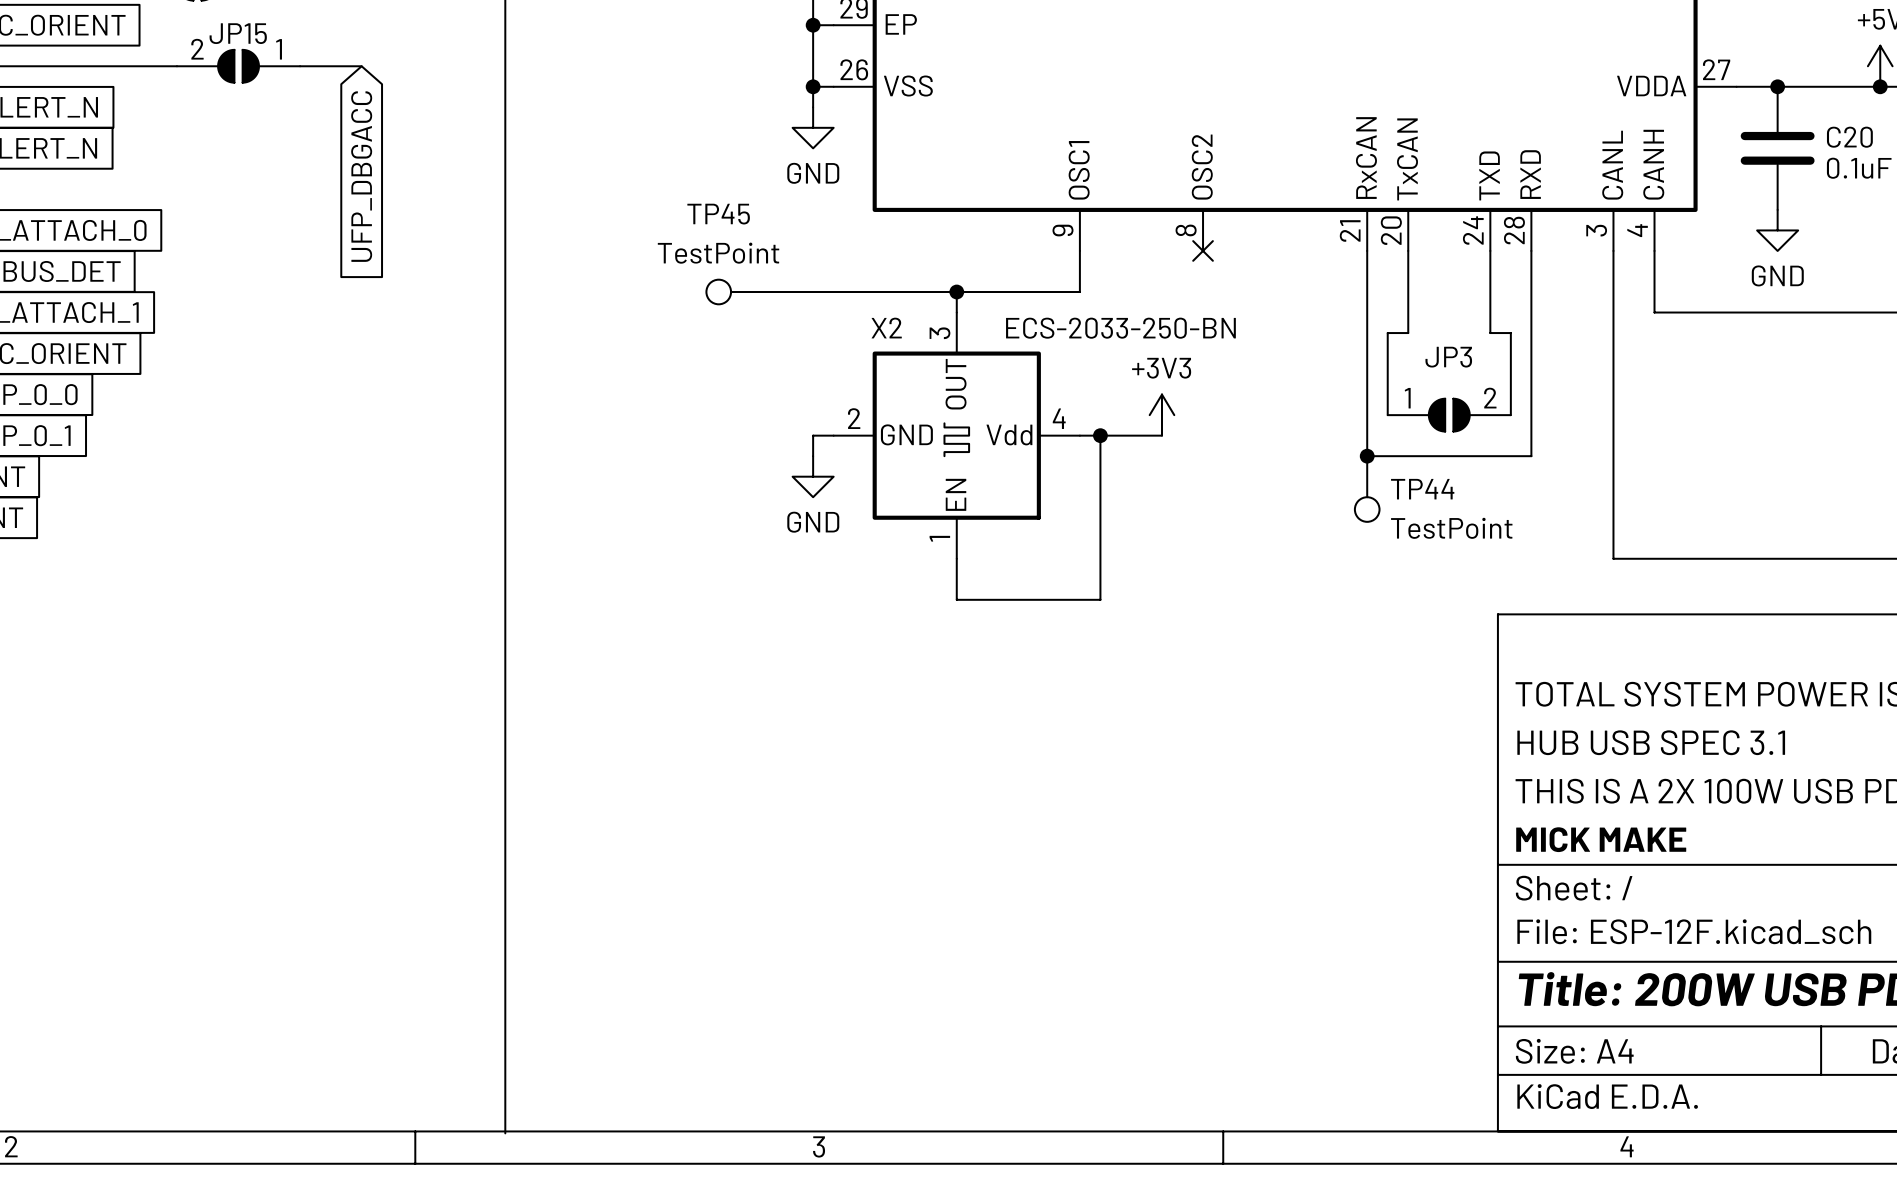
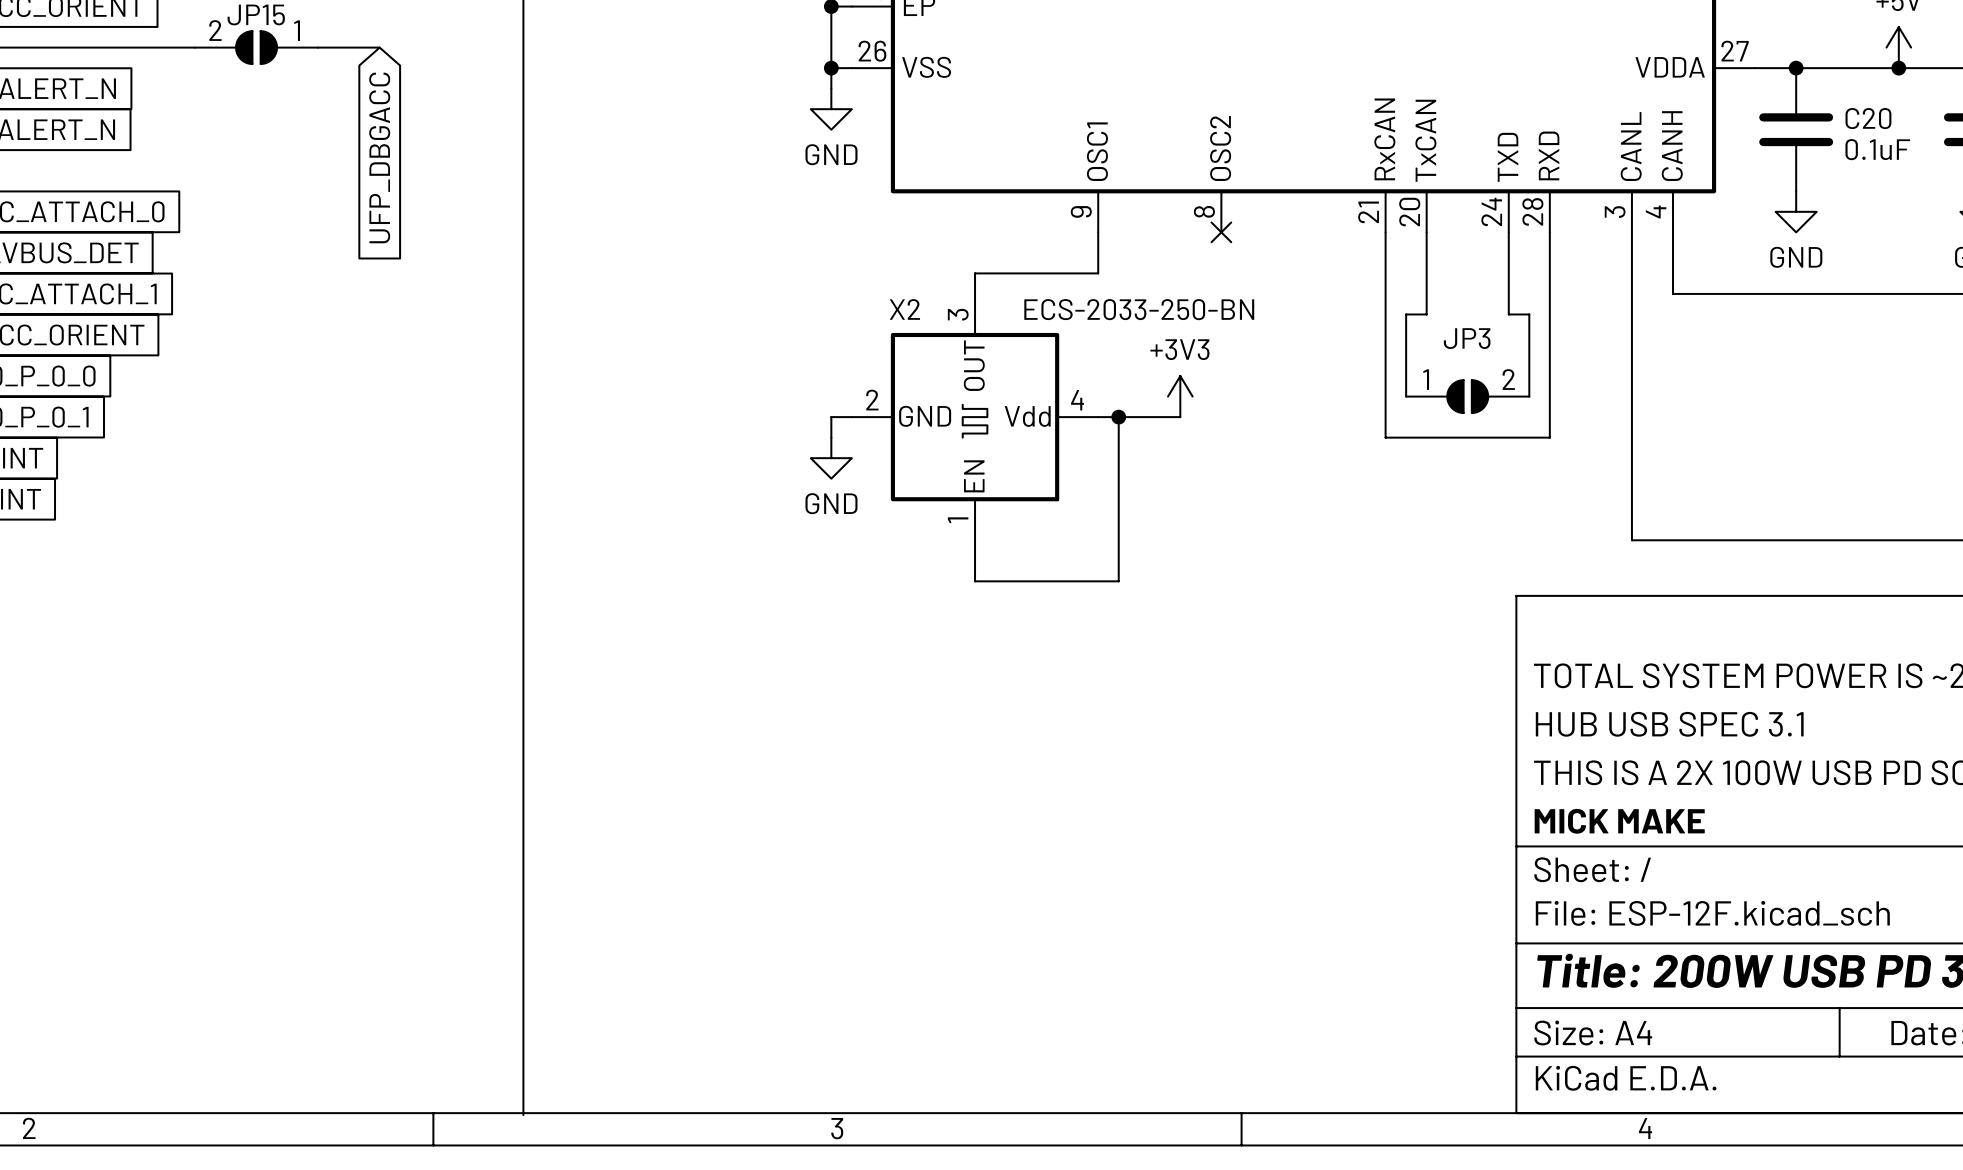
TP45: TestPoint (739, 292) -> none
wire: (772, 292) (956, 292) -> none
junction: (956, 292) -> none
junction: (1367, 456) -> none
TP44: TestPoint (1367, 489) -> none

